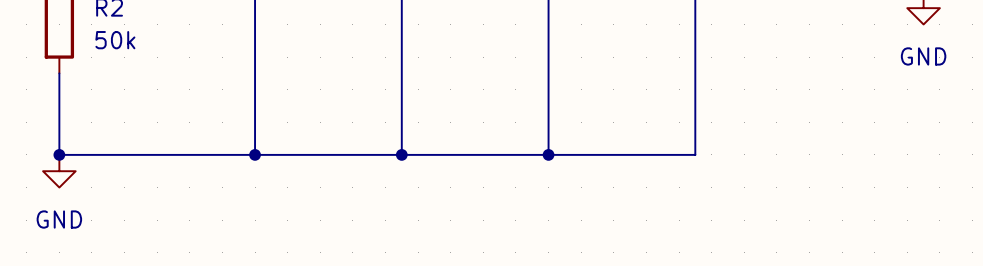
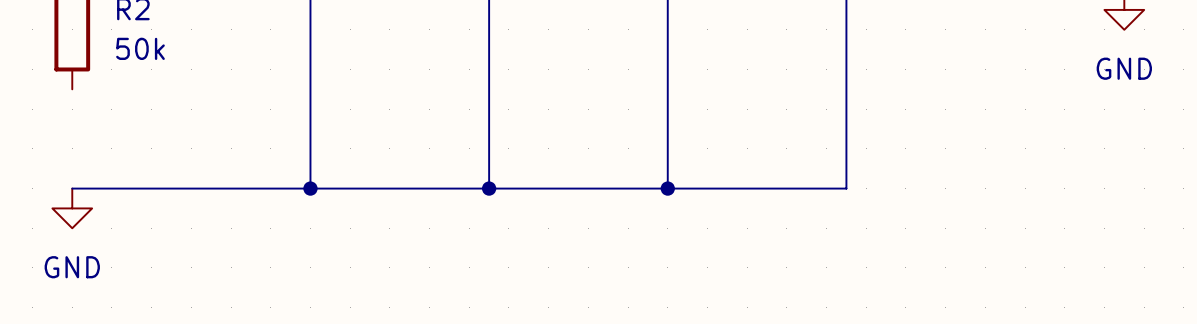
wire: (59, 73) (59, 154) -> none
junction: (59, 154) -> none

